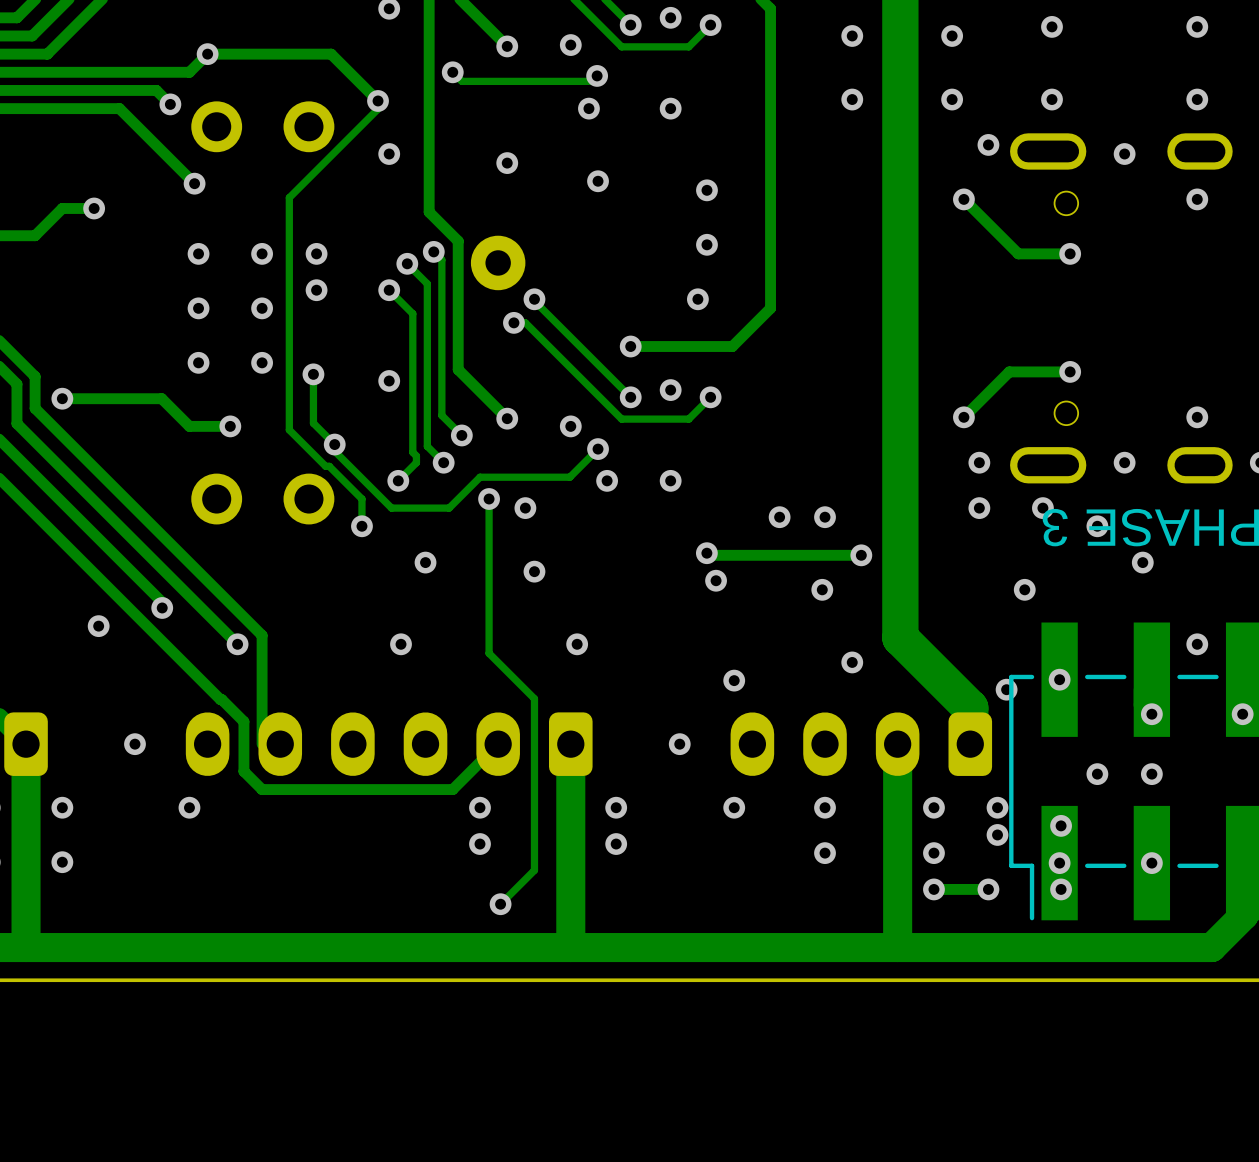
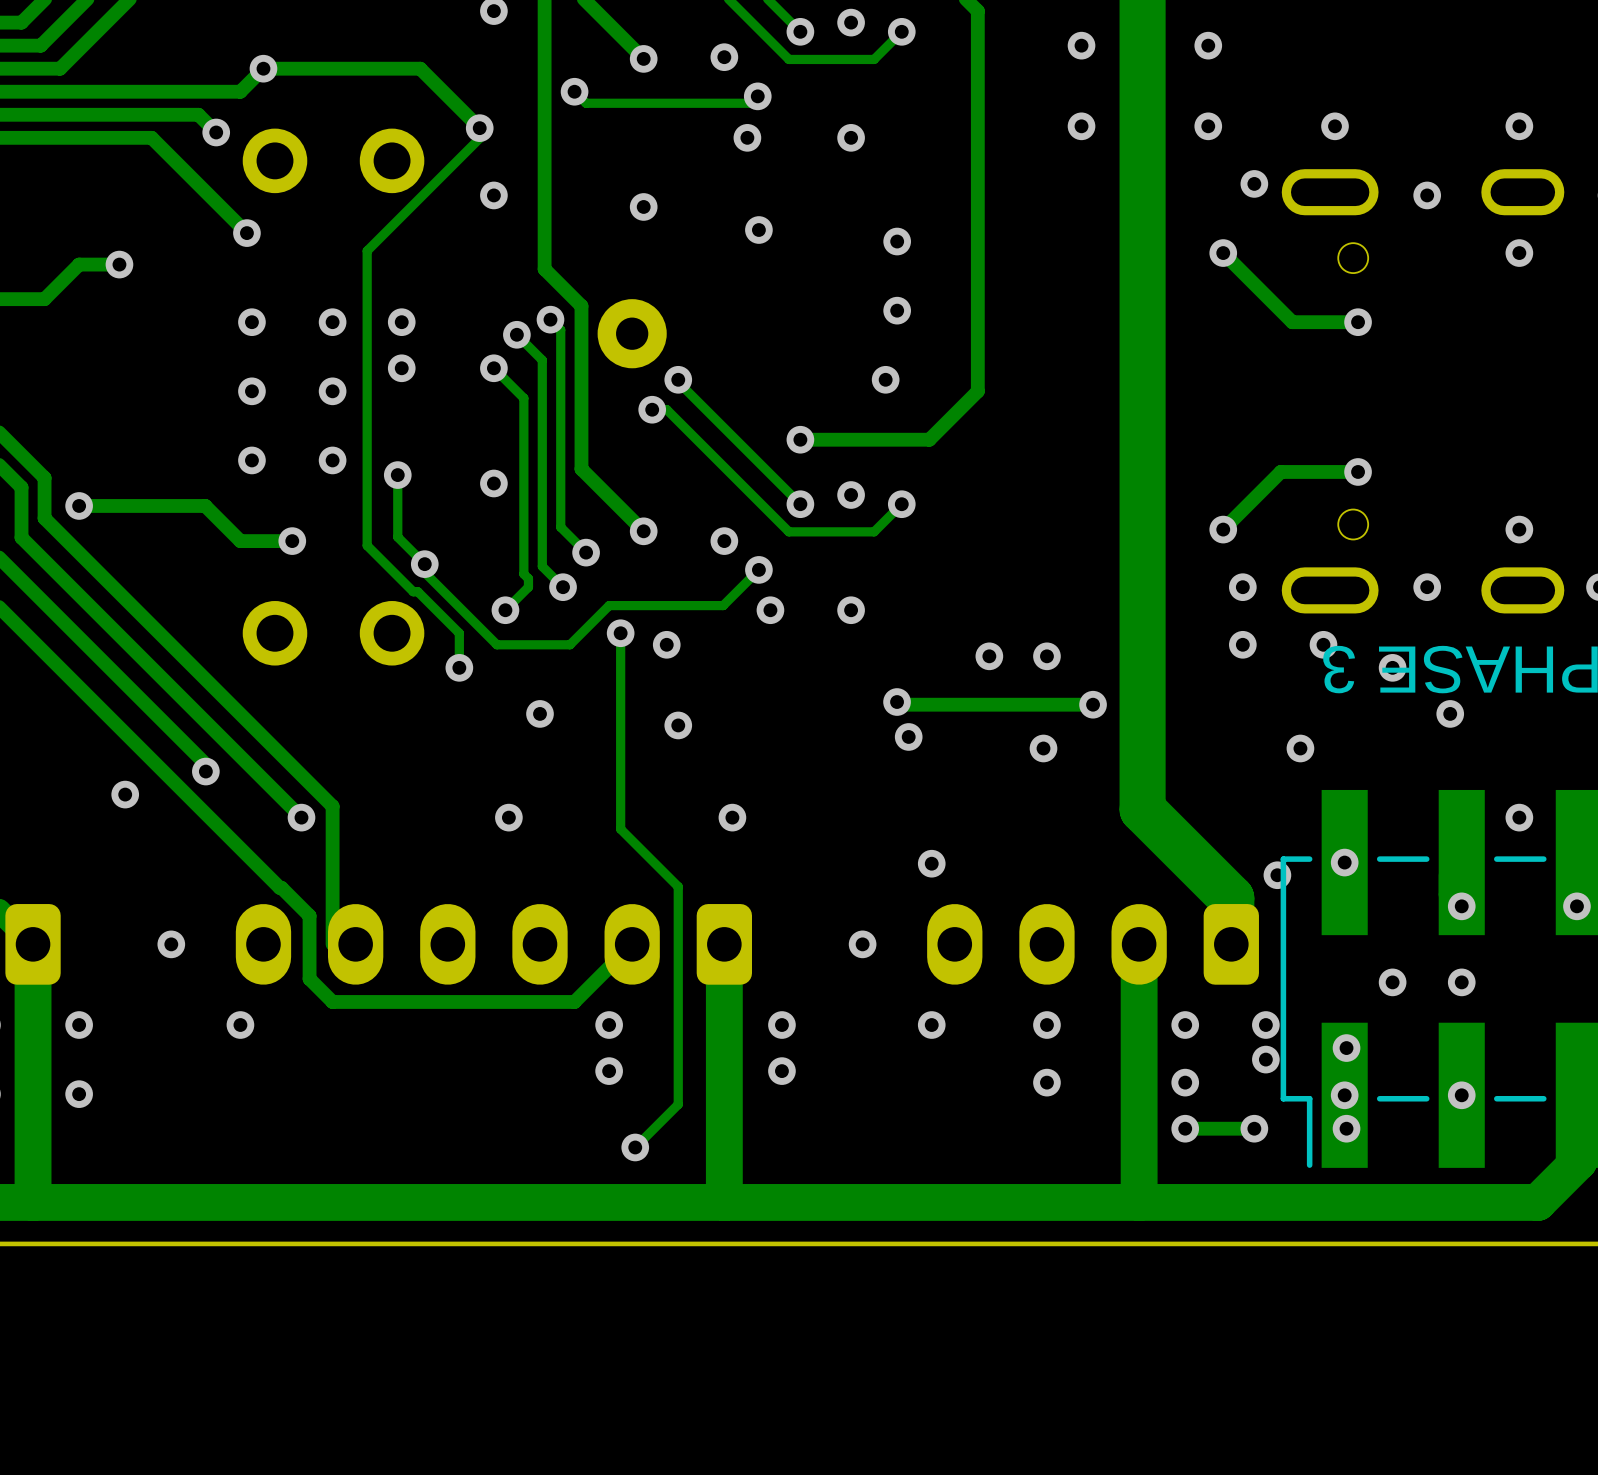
via: (1051, 26) -> none
via: (1197, 26) -> none
via: (852, 662) -> none

